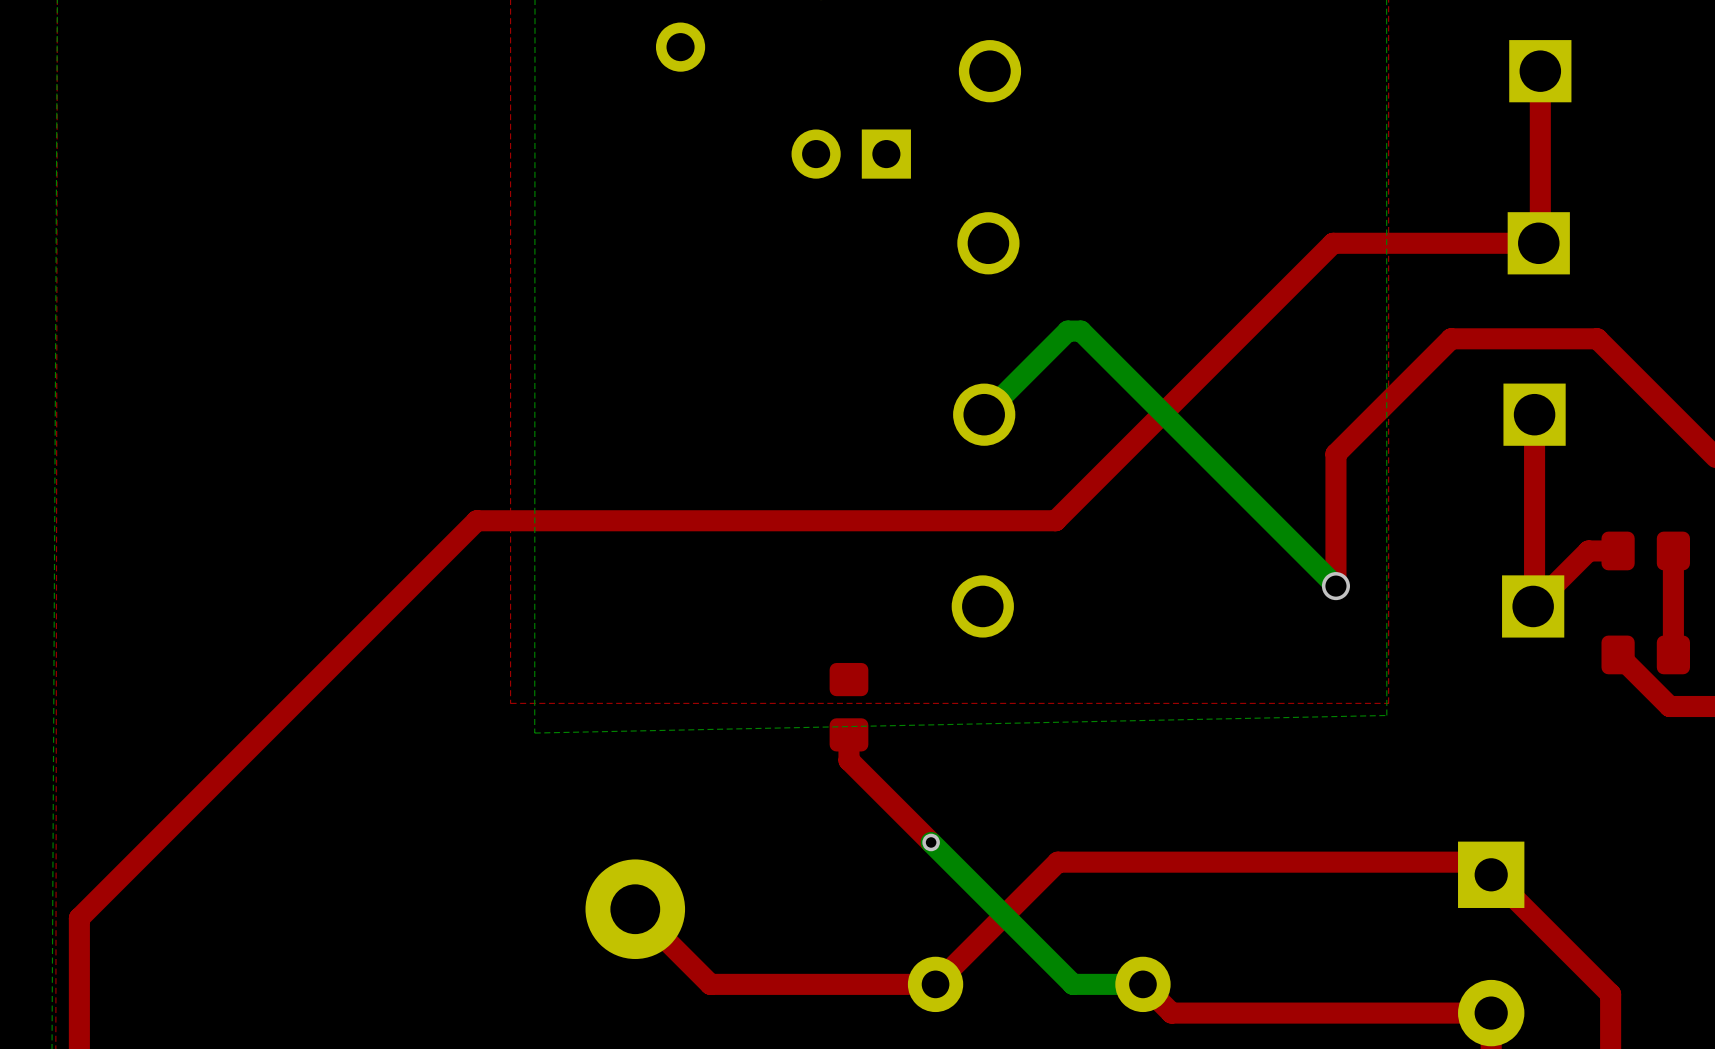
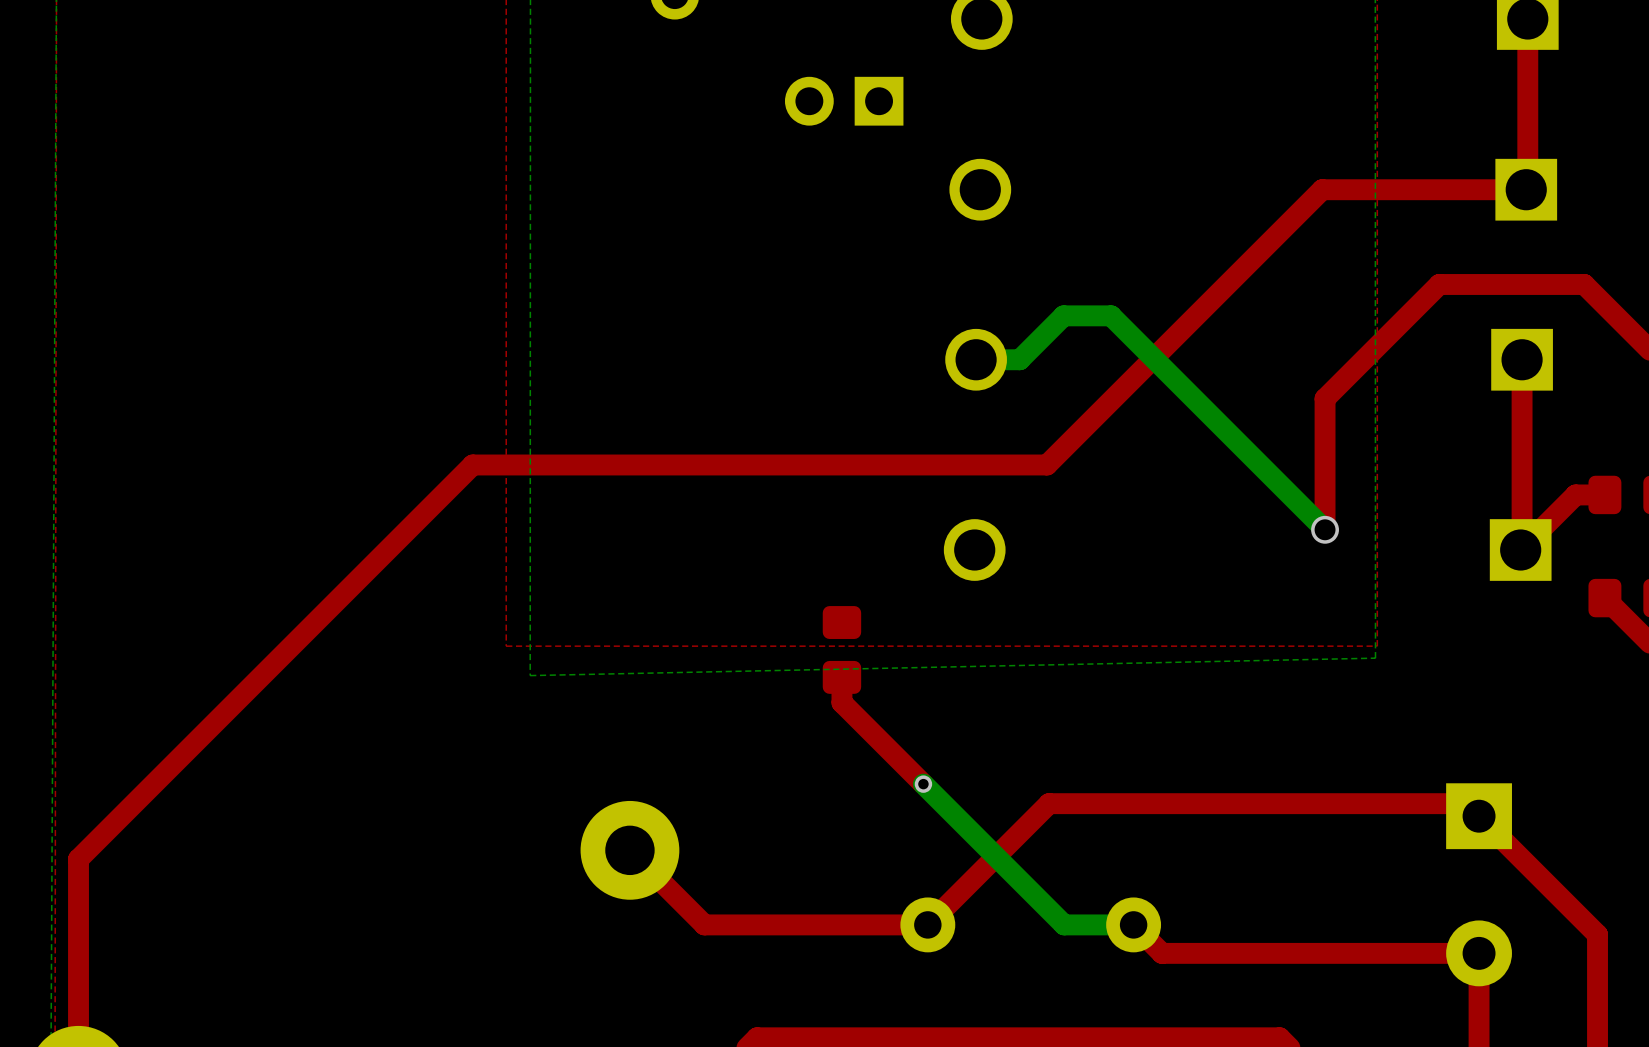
bottom track: (1120, 370) (1080, 331) (1067, 331) (984, 414) -> (1111, 315) (1063, 315) (1019, 359) (976, 359)

